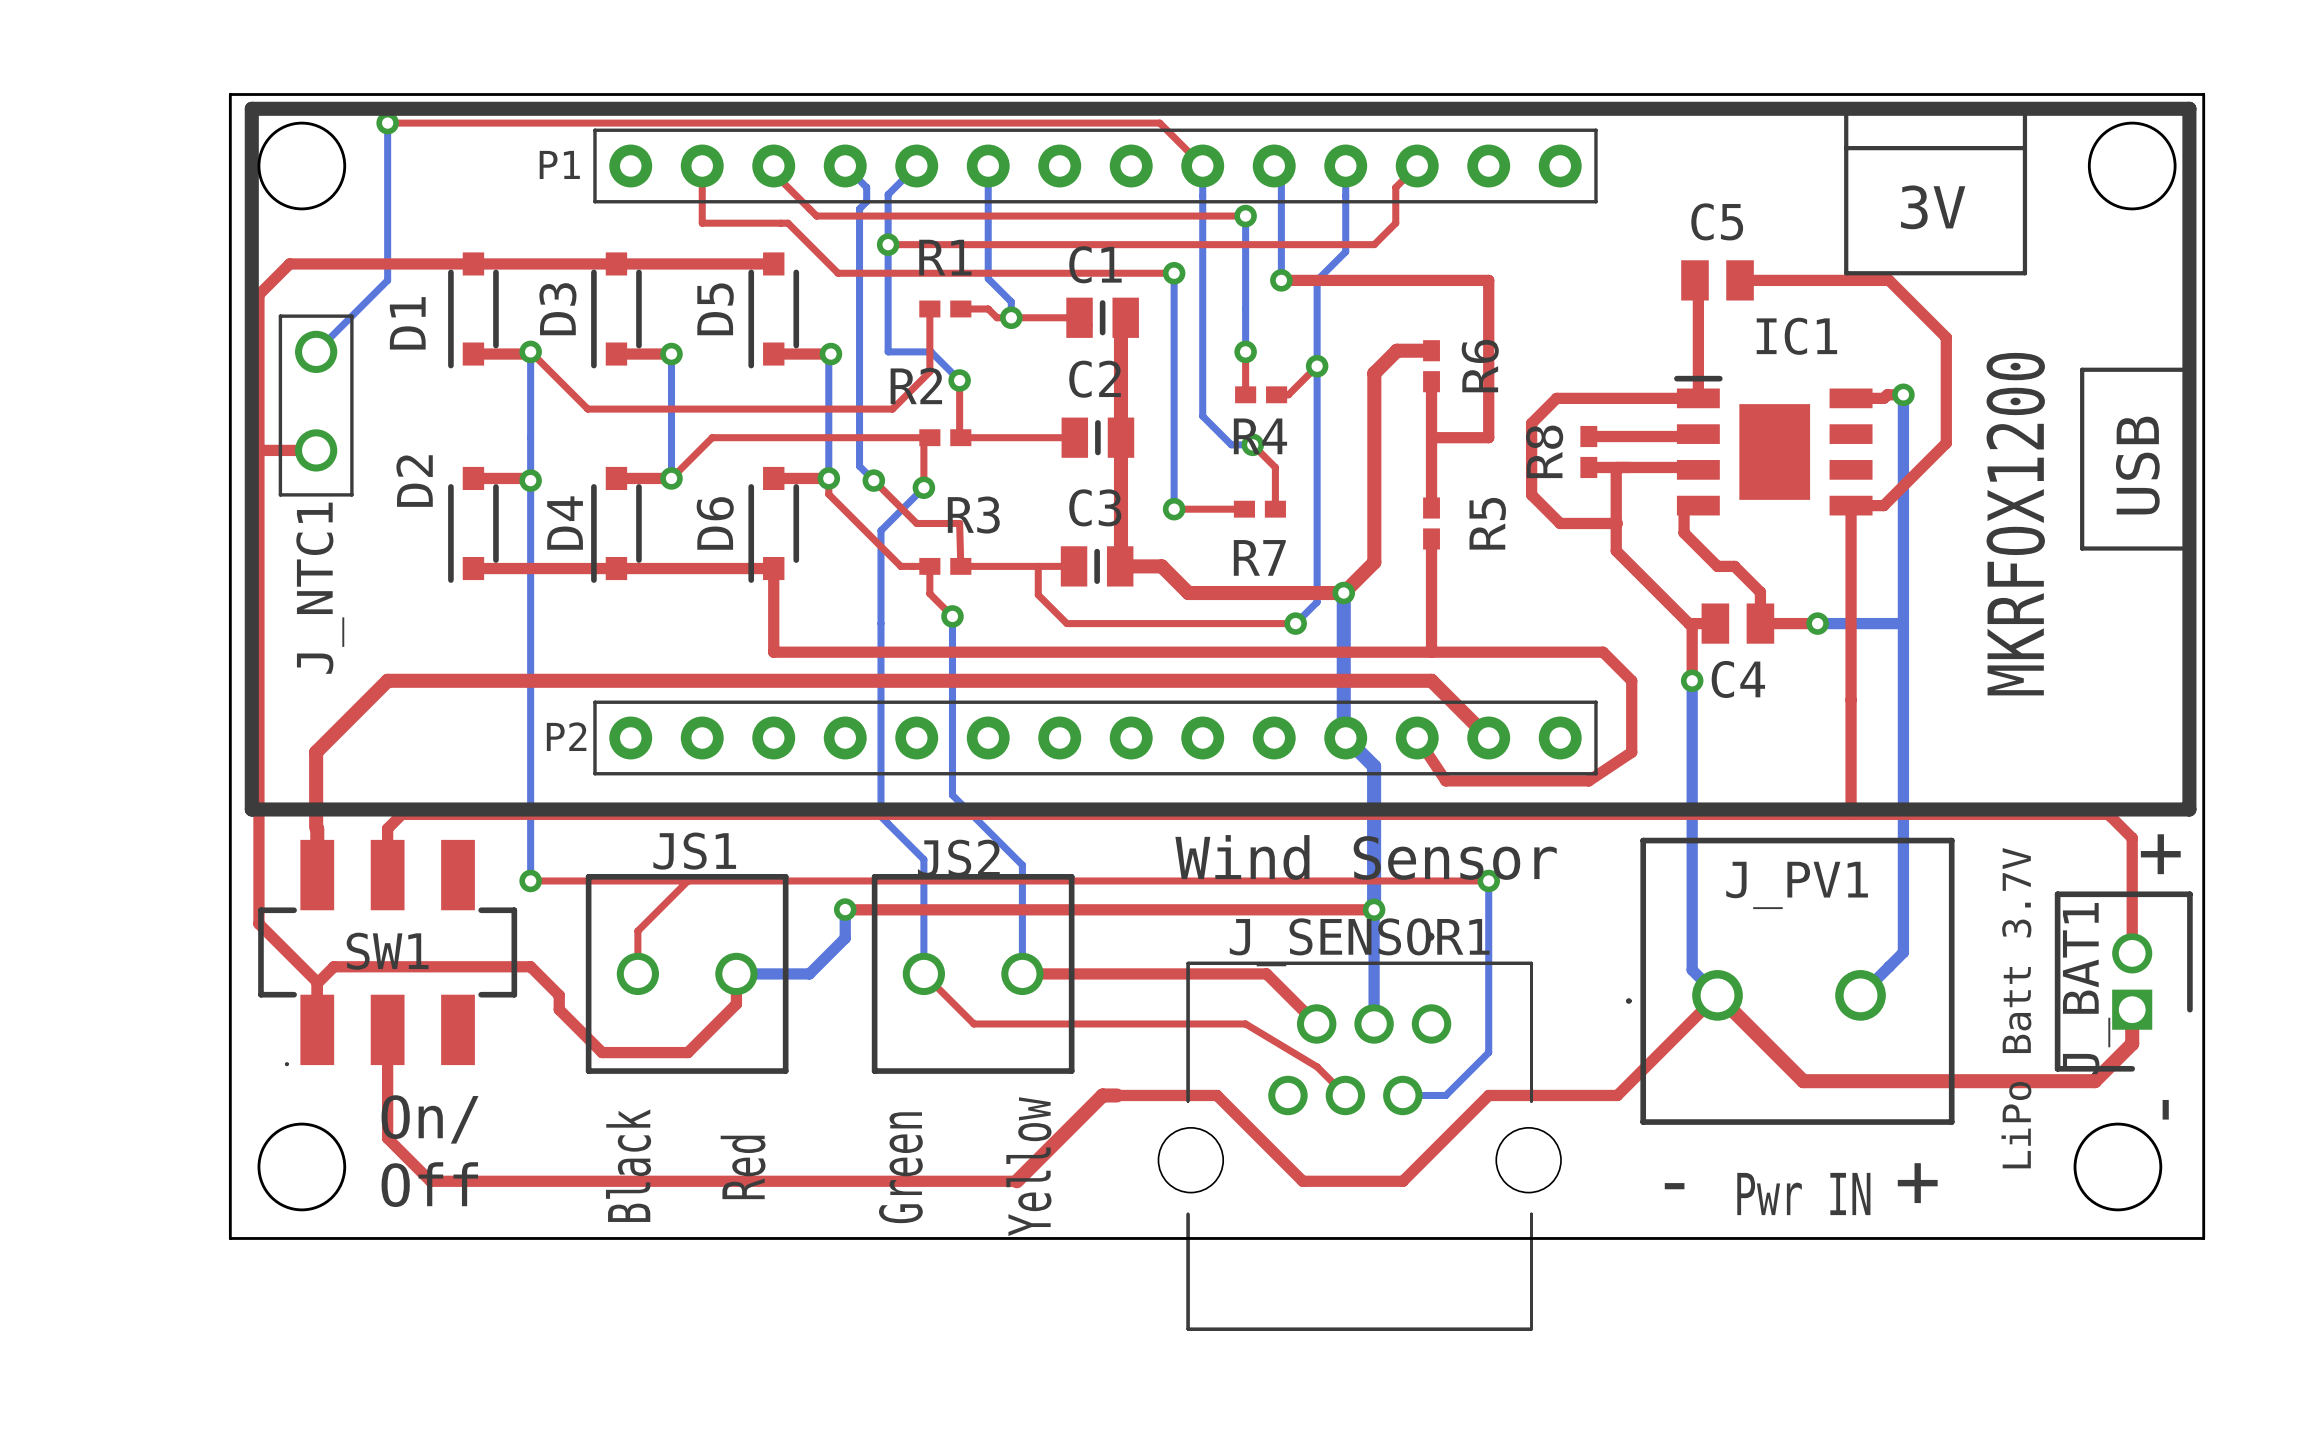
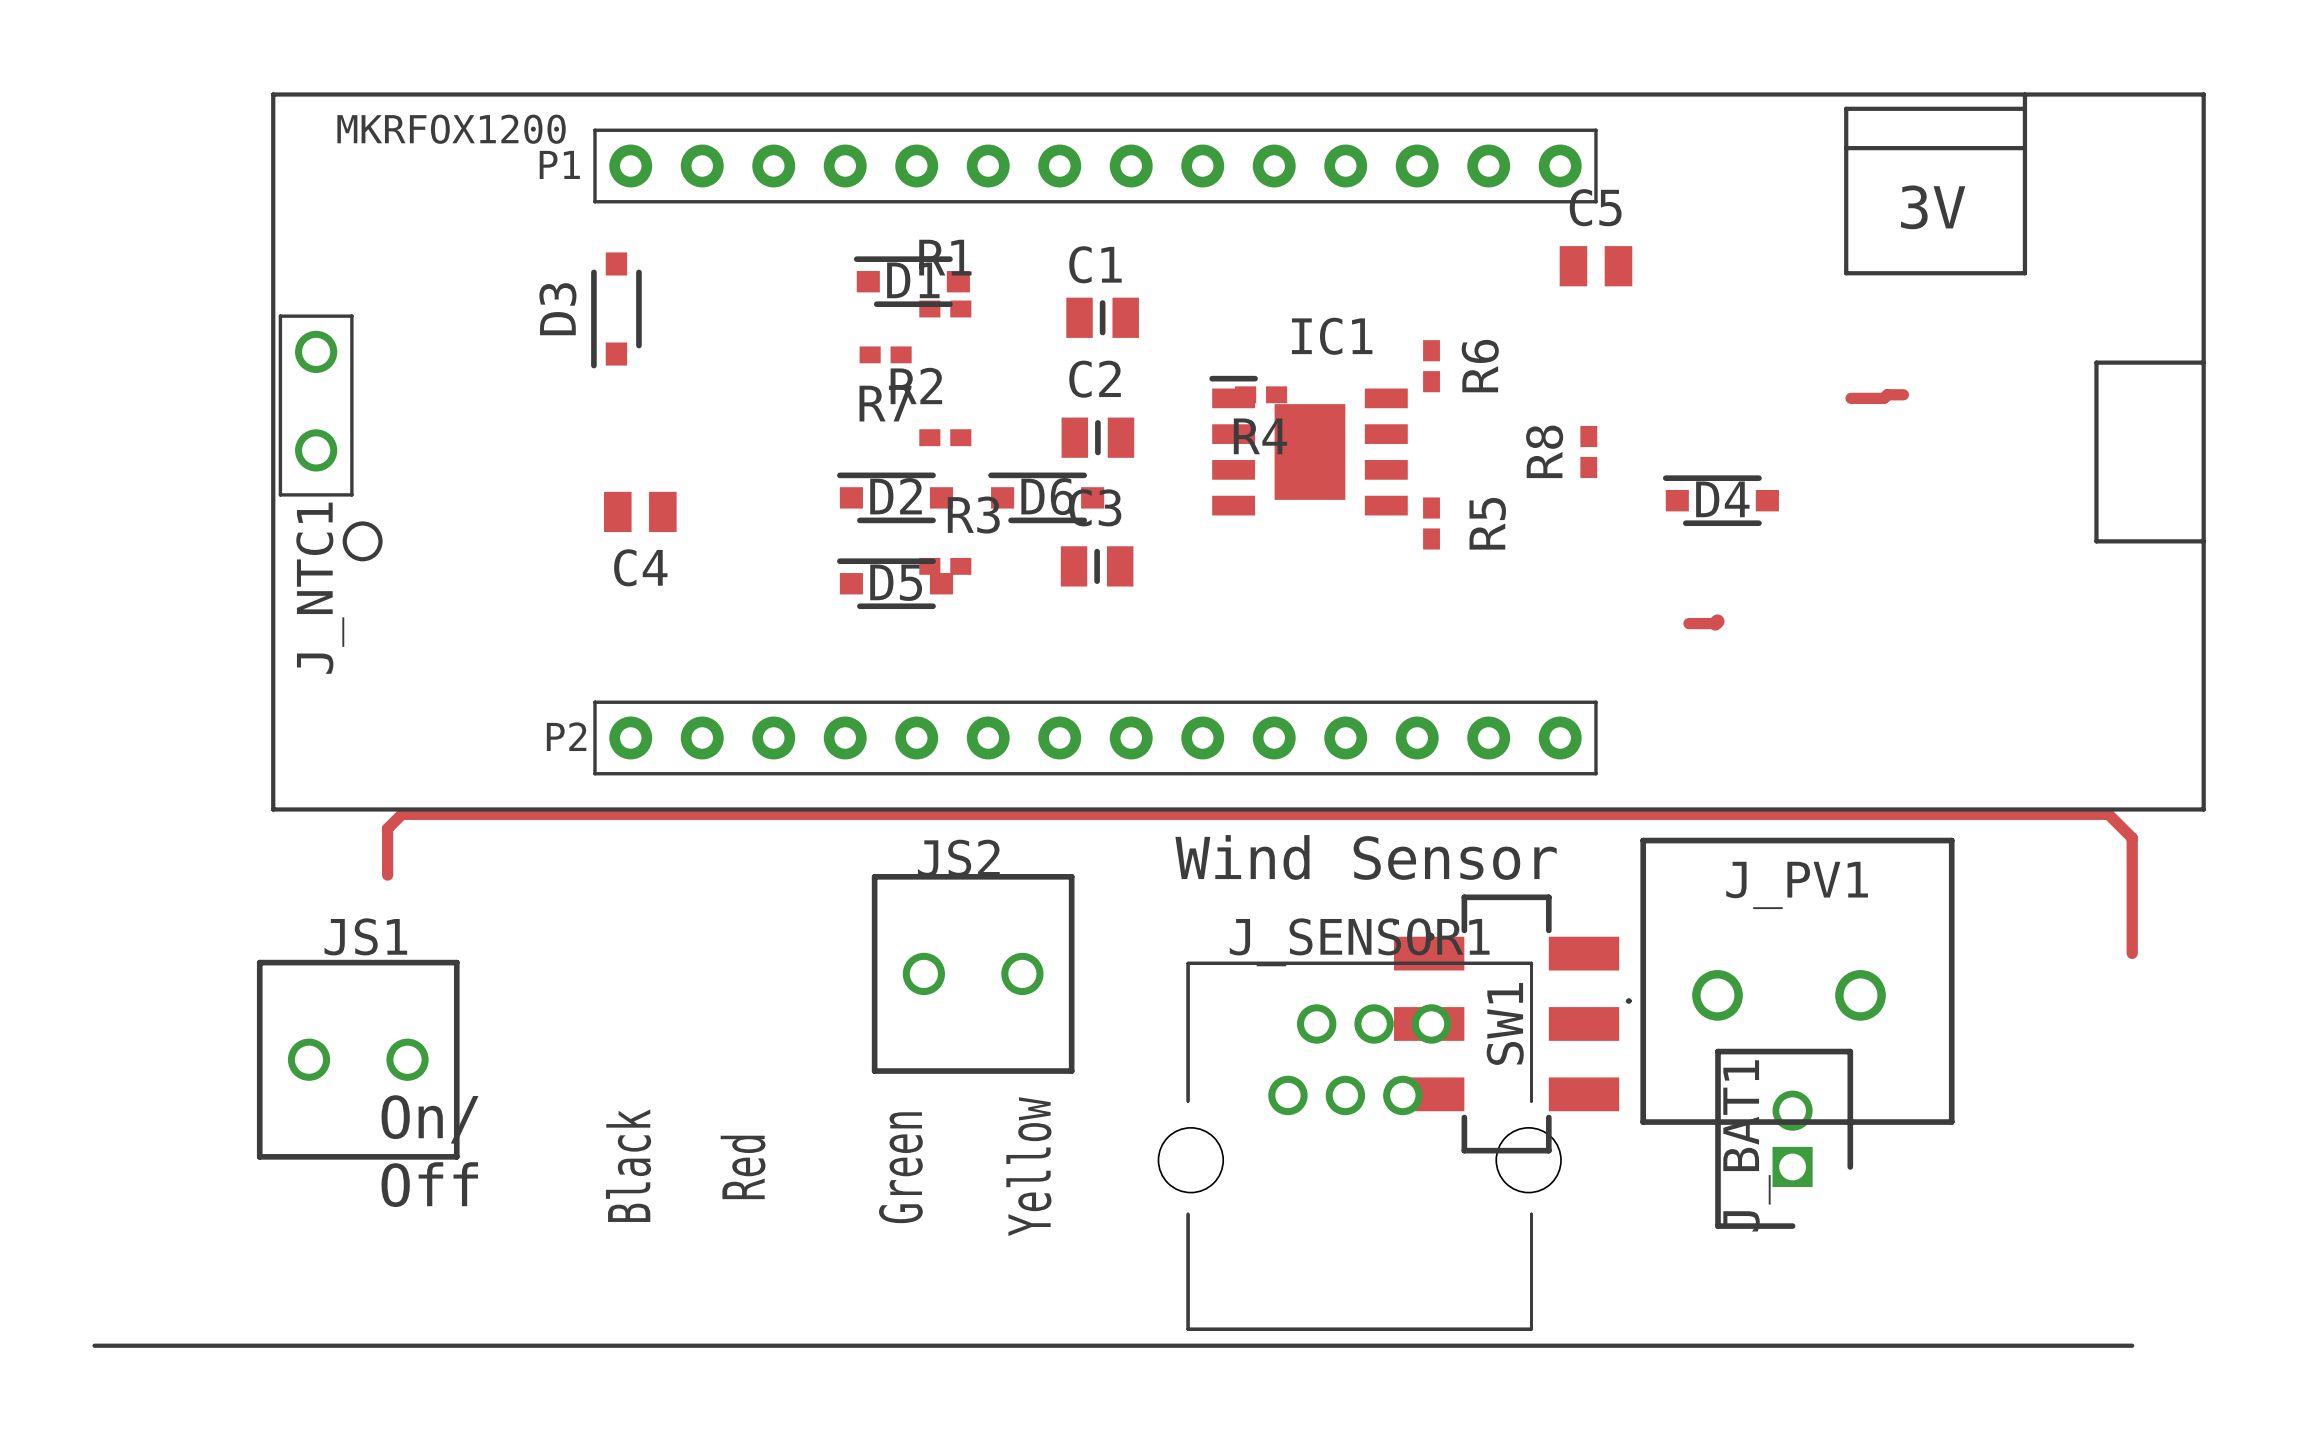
board edge: (230, 94) (2203, 94) (2203, 1238) (230, 1238) (230, 94) -> none
line: none -> (2024, 94) (2024, 108)
round board edge: [257, 121, 347, 211] -> none
round board edge: [2087, 121, 2177, 211] -> none
top track: (387, 123) (1159, 123) (1202, 166) -> none
bottom track: (387, 123) (387, 280) (316, 351) -> none
via: (387, 123) -> none
text: none -> MKRFOX1200 (451, 129)
top track: (702, 166) (702, 223) (788, 223) (838, 273) (1174, 273) -> none
top track: (773, 166) (773, 173) (816, 216) (1245, 216) -> none
bottom track: (845, 166) (866, 187) (866, 201) (859, 208) (859, 466) (873, 480) -> none
bottom track: (916, 166) (888, 194) (888, 351) (931, 351) (959, 380) -> none
bottom track: (988, 166) (988, 278) (1011, 301) (1011, 317) -> none
bottom track: (1202, 166) (1202, 416) (1231, 444) (1252, 444) -> none
bottom track: (1274, 166) (1281, 173) (1281, 280) -> none
bottom track: (1345, 166) (1345, 251) (1317, 280) (1317, 602) (1295, 623) -> none
top track: (1417, 166) (1395, 187) (1395, 223) (1374, 244) (888, 244) -> none
bottom track: (1245, 216) (1245, 351) -> none
via: (1245, 216) -> none
via: (888, 244) -> none
top track: (773, 263) (289, 263) (258, 294) (258, 923) (317, 982) (317, 1029) -> none
bottom track: (1174, 273) (1174, 509) -> none
via: (1174, 273) -> none
top track: (1281, 280) (1488, 280) (1488, 437) (1431, 437) -> none
via: (1281, 280) -> none
top track: (1695, 280) (1698, 283) (1698, 398) -> none
C5 position: (1717, 280) -> (1595, 266)
top track: (1740, 280) (1889, 280) (1946, 337) (1946, 443) (1883, 505) (1851, 505) (1851, 814) -> none
top track: (929, 308) (929, 371) (892, 409) (587, 409) (530, 351) (528, 354) (473, 354) -> none
top track: (960, 308) (988, 308) (997, 317) (1079, 317) (1087, 325) -> none
D5 name position: D5 (715, 309) -> D5 (896, 582)
D1 rotation: 0° (473, 310) -> 90° clockwise (911, 281)
D1 position: (473, 310) -> (911, 281)
D5 rotation: 0° (773, 310) -> 90° clockwise (895, 583)
D5 position: (773, 310) -> (895, 583)
via: (1011, 317) -> none
top track: (1125, 317) (1120, 322) (1120, 566) (1161, 566) (1188, 593) (1343, 593) (1374, 562) (1374, 373) (1396, 350) (1431, 350) -> none
D1 name position: D1 (407, 323) -> D1 (913, 280)
bottom track: (530, 351) (530, 880) -> none
via: (530, 351) -> none
top track: (1245, 351) (1245, 394) -> none
via: (1245, 351) -> none
top track: (616, 354) (671, 354) -> none
bottom track: (671, 354) (671, 478) -> none
via: (671, 354) -> none
top track: (773, 354) (830, 354) -> none
bottom track: (830, 354) (828, 356) (828, 478) -> none
via: (830, 354) -> none
top track: (1317, 366) (1288, 394) (1276, 394) -> none
via: (1317, 366) -> none
line: (2189, 369) (2082, 369) (2082, 548) (2189, 548) -> (2203, 362) (2096, 362) (2096, 541) (2203, 541)
top track: (959, 380) (960, 437) (1074, 437) -> none
via: (959, 380) -> none
top track: (1431, 381) (1431, 508) -> none
bottom track: (1903, 394) (1903, 952) (1860, 995) -> none
via: (1903, 394) -> none
top track: (1684, 398) (1556, 398) (1531, 423) (1531, 494) (1560, 523) (1617, 523) -> none
top track: (1684, 434) (1681, 436) (1588, 436) -> none
top track: (929, 437) (712, 437) (671, 478) (616, 478) -> none
top track: (923, 444) (923, 487) -> none
top track: (1252, 444) (1275, 467) (1275, 509) -> none
via: (1252, 444) -> none
IC1 position: (1773, 445) -> (1308, 445)
top track: (316, 450) (260, 450) (258, 451) -> none
text: USB (2137, 465) -> none
top track: (1588, 467) (1681, 467) (1684, 469) -> none
top track: (1616, 467) (1616, 550) (1692, 626) (1692, 680) -> none
top track: (473, 478) (528, 478) (530, 480) -> none
via: (671, 478) -> none
top track: (773, 478) (828, 478) (828, 494) (900, 566) (929, 566) (929, 593) (952, 616) -> none
via: (828, 478) -> none
via: (530, 480) -> none
top track: (873, 480) (916, 523) (959, 523) (960, 566) (1074, 566) -> none
via: (873, 480) -> none
D2 name position: D2 (414, 481) -> D2 (896, 496)
bottom track: (923, 487) (880, 530) (880, 816) (923, 859) (923, 973) -> none
via: (923, 487) -> none
top track: (1684, 505) (1684, 532) (1717, 566) (1734, 566) (1760, 592) (1760, 623) (1817, 623) -> none
top track: (1174, 509) (1244, 509) -> none
via: (1174, 509) -> none
R7 position: (1259, 509) -> (885, 354)
drawing: none -> [342, 521, 383, 562]
D6 name position: D6 (715, 523) -> D6 (1047, 496)
D2 rotation: 0° (473, 524) -> 90° clockwise (895, 497)
D2 position: (473, 524) -> (895, 497)
D4 rotation: 0° (616, 524) -> 90° clockwise (1720, 500)
D4 position: (616, 524) -> (1720, 500)
D6 rotation: 0° (773, 524) -> 90° clockwise (1046, 497)
D6 position: (773, 524) -> (1046, 497)
text: MKRFOX1200 (2015, 524) -> none
top track: (1431, 538) (1431, 652) -> none
top track: (1038, 566) (1038, 594) (1066, 623) (1295, 623) -> none
top track: (473, 568) (773, 568) (773, 652) (1603, 652) (1631, 680) (1631, 752) (1588, 780) (1445, 780) (1417, 737) -> none
bottom track: (1343, 593) (1343, 736) (1374, 766) (1374, 1023) -> none
via: (1343, 593) -> none
bottom track: (952, 616) (952, 795) (1022, 865) (1022, 973) -> none
via: (952, 616) -> none
via: (1295, 623) -> none
C4 position: (1737, 623) -> (640, 511)
bottom track: (1817, 623) (1903, 623) -> none
via: (1817, 623) -> none
bottom track: (1692, 680) (1692, 970) (1717, 995) -> none
via: (1692, 680) -> none
top track: (1488, 737) (1431, 680) (387, 680) (316, 752) (317, 875) -> none
line: (273, 809) (251, 809) (251, 108) (2189, 108) (2189, 809) -> (273, 809) (273, 94) (2203, 94) (2203, 809) (2189, 809)
line width: thick (273, 809) (2189, 809) -> thin (273, 809) (2189, 809)
text: + (2160, 854) -> none
top track: (530, 880) (1488, 880) -> none
via: (530, 880) -> none
top track: (687, 880) (637, 931) (637, 973) -> none
bottom track: (1488, 880) (1488, 1052) (1445, 1095) (1402, 1095) -> none
via: (1488, 880) -> none
top track: (845, 909) (1374, 909) -> none
bottom track: (845, 909) (845, 938) (809, 973) (736, 973) -> none
via: (845, 909) -> none
via: (1374, 909) -> none
SW1 rotation: 0° (387, 953) -> 90° clockwise (1506, 1023)
SW1 position: (387, 953) -> (1506, 1023)
JS1 position: (687, 973) -> (358, 1059)
top track: (736, 973) (736, 1004) (687, 1052) (602, 1052) (559, 1009) (559, 995) (530, 966) (333, 966) (317, 983) -> none
top track: (1022, 973) (1266, 973) (1316, 1023) -> none
J_BAT1 position: (2123, 981) -> (1784, 1138)
top track: (923, 988) (923, 973) (973, 1023) (1245, 1023) (1317, 1066) (1345, 1095) -> none
text: LiPo Batt 3.7V (2016, 1008) -> none
top track: (2132, 1009) (2132, 1043) (2094, 1081) (1803, 1081) (1717, 995) (1617, 1095) (1488, 1095) (1402, 1181) (1302, 1181) (1217, 1095) (1102, 1095) (1016, 1181) (430, 1181) (387, 1138) (387, 1029) -> none
text: - (2165, 1109) -> none
round board edge: [257, 1122, 347, 1212] -> none
round board edge: [2073, 1122, 2163, 1212] -> none
text: + (1917, 1183) -> none
text: - (1674, 1186) -> none
text: Pwr IN (1803, 1194) -> none
line: none -> (94, 1345) (2132, 1345)

